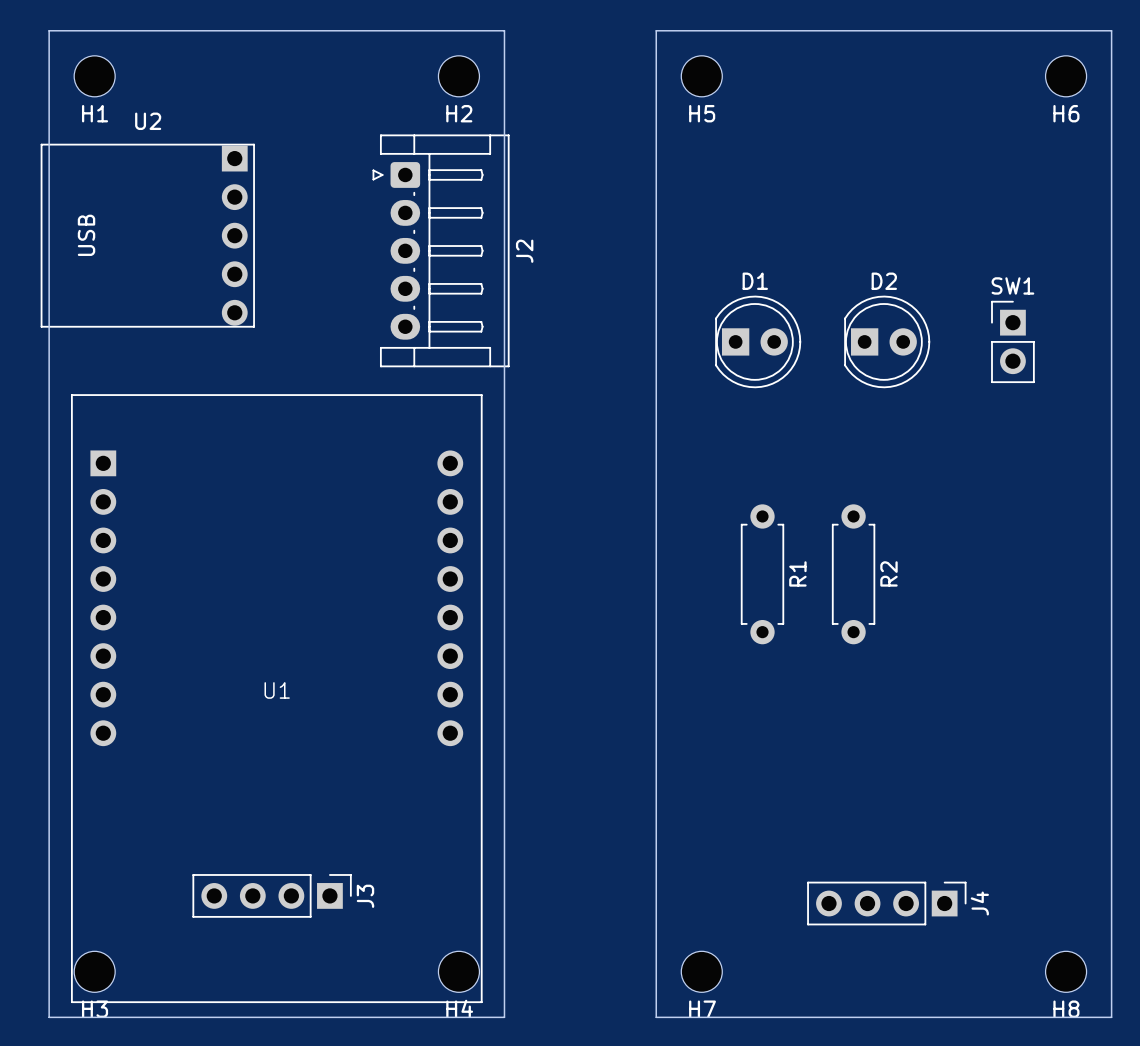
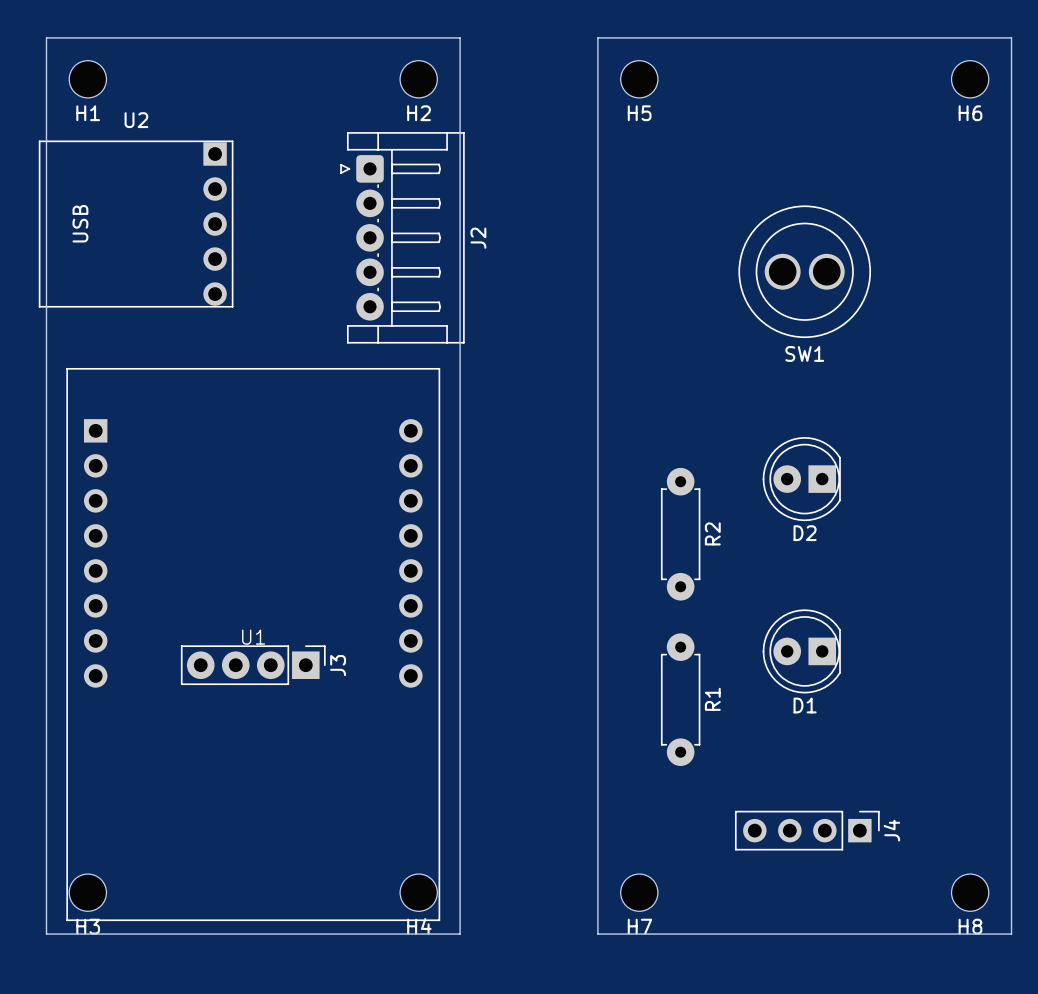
J2 footprint: [372, 134, 510, 368] -> [340, 132, 465, 344]
D1 name position: D1 (755, 281) -> D1 (805, 705)
D2 name position: D2 (884, 281) -> D2 (805, 533)
SW1 name position: SW1 (1012, 285) -> SW1 (804, 353)
D1 footprint: [715, 295, 802, 389] -> [762, 609, 841, 694]
D2 footprint: [844, 295, 931, 389] -> [762, 437, 841, 522]
SW1 footprint: [991, 300, 1035, 384] -> [738, 205, 872, 339]
R1 footprint: [740, 504, 785, 645] -> [660, 633, 701, 766]
R2 footprint: [831, 504, 876, 645] -> [660, 467, 701, 601]
J3 footprint: [192, 874, 352, 918] -> [180, 645, 326, 686]

